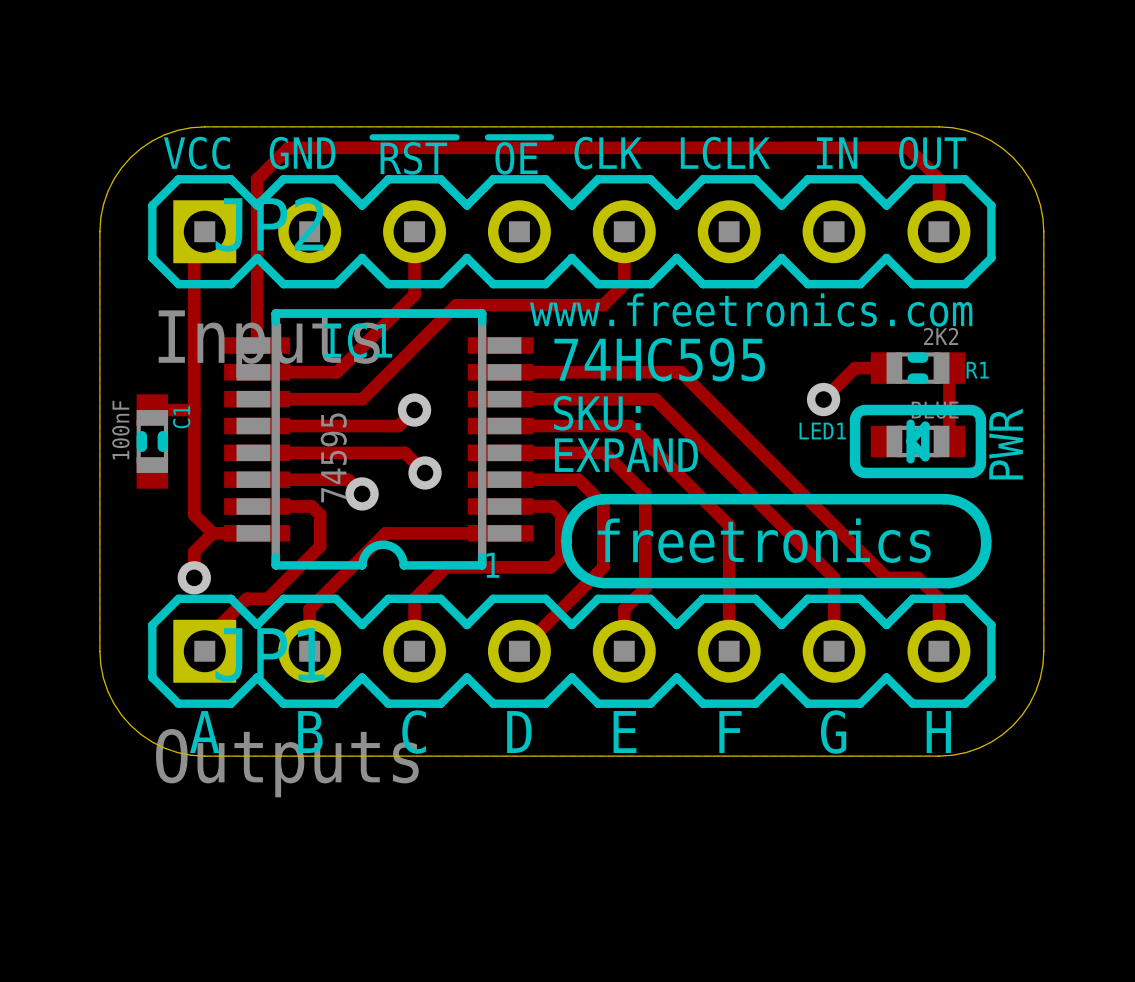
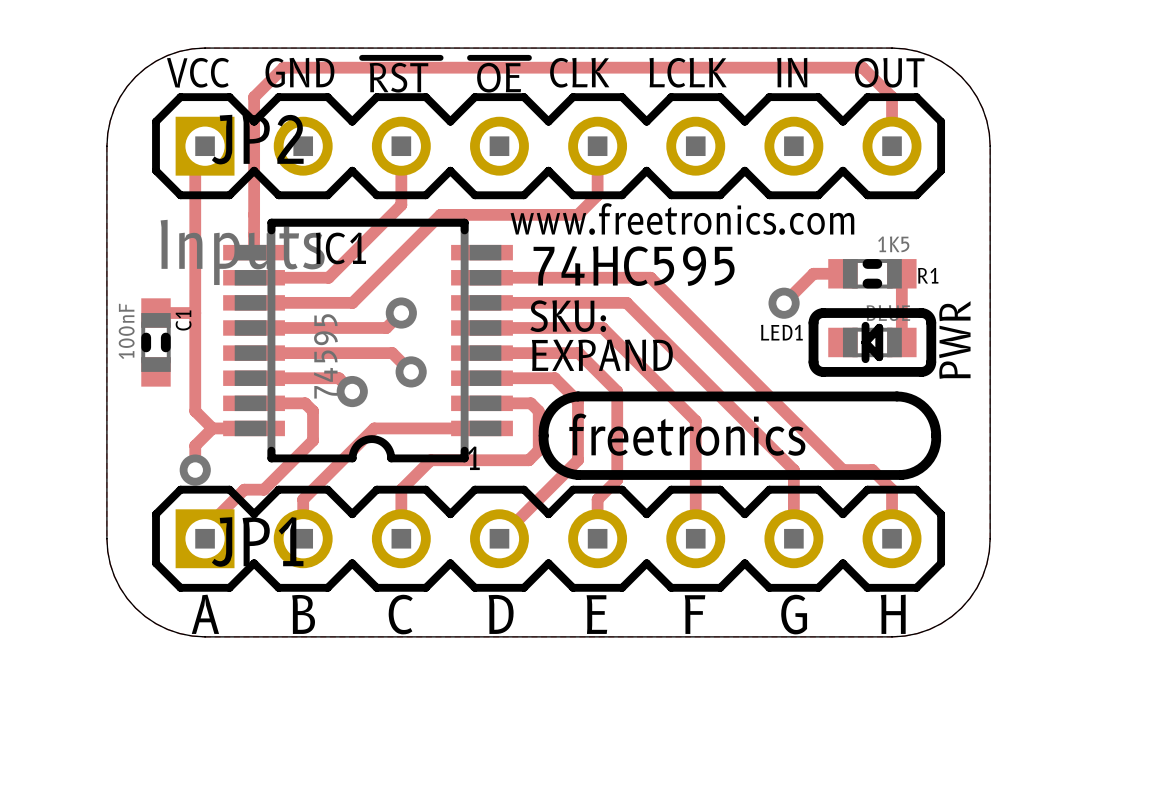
R1 value: 2K2 (941, 336) -> 1K5 (893, 244)
JP1 value: Outputs (287, 763) -> none

